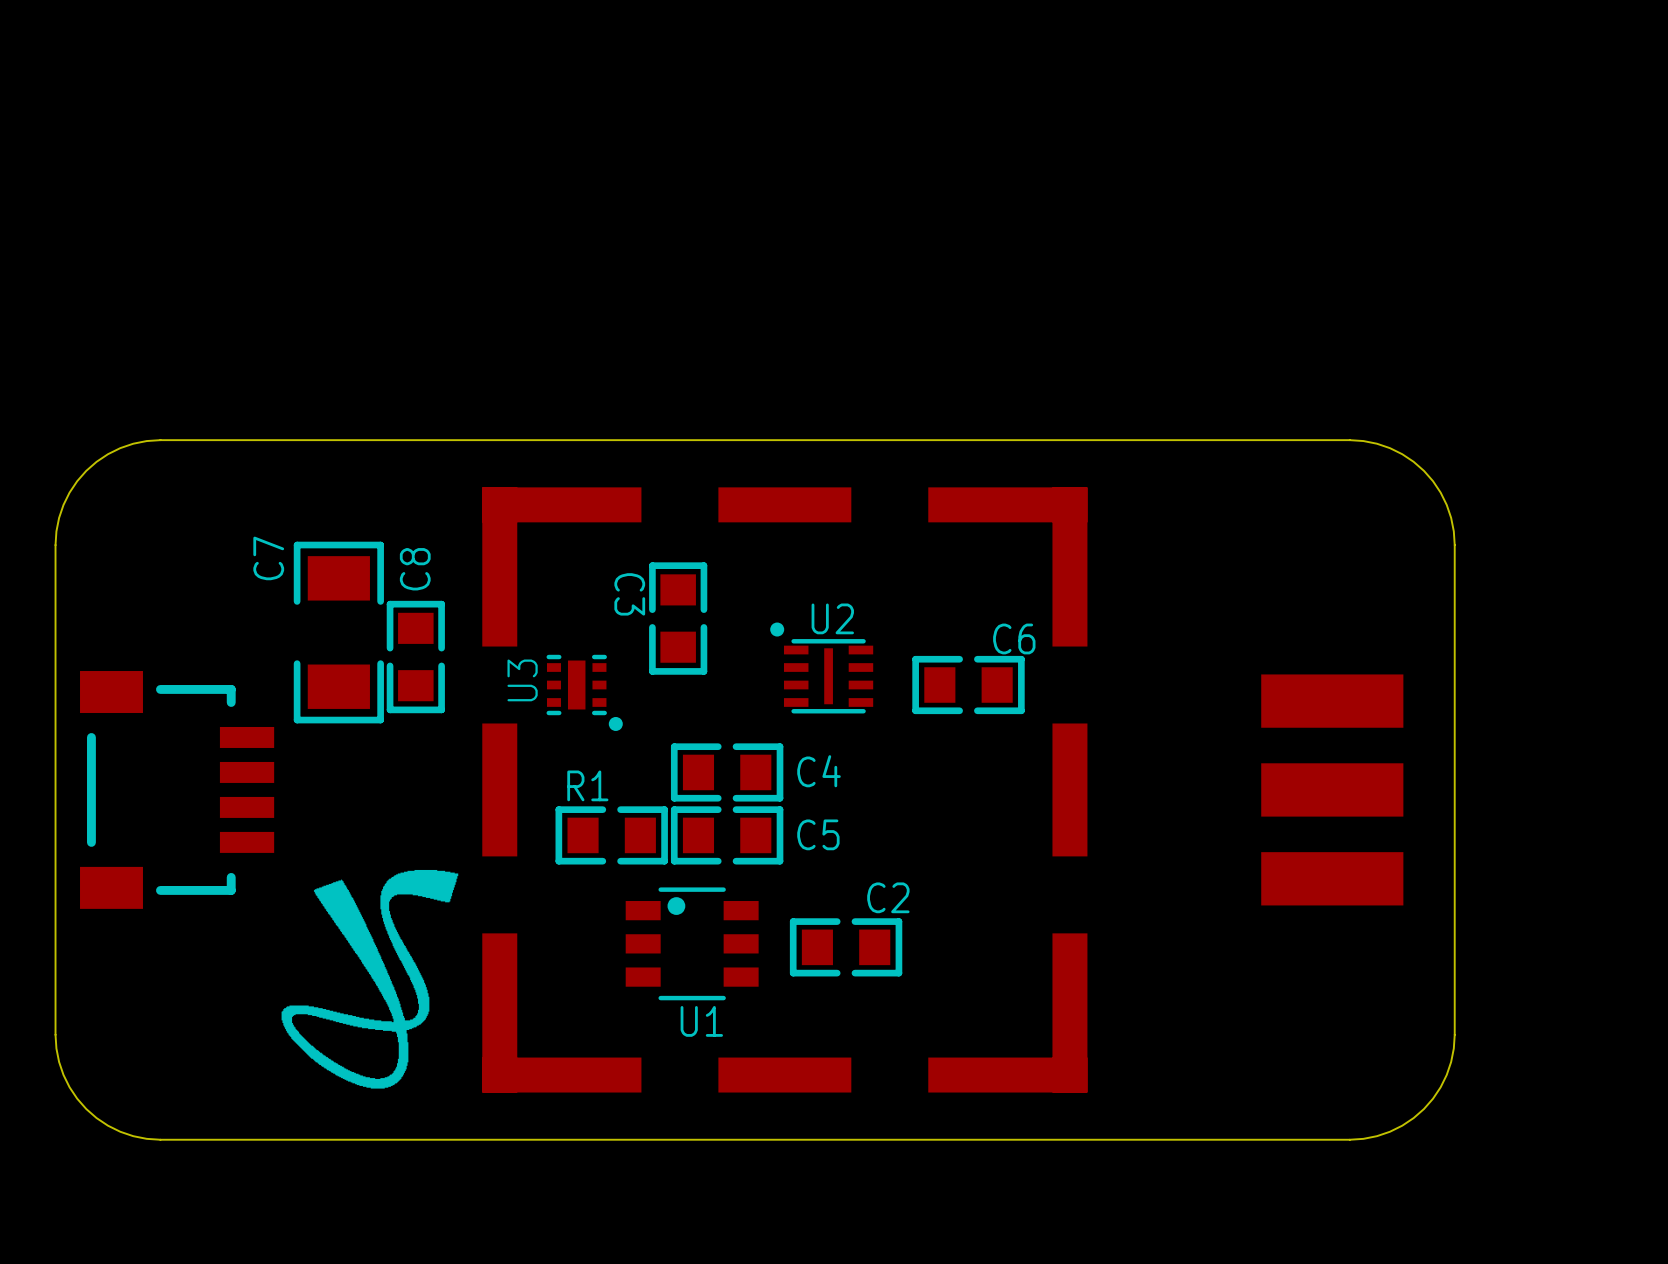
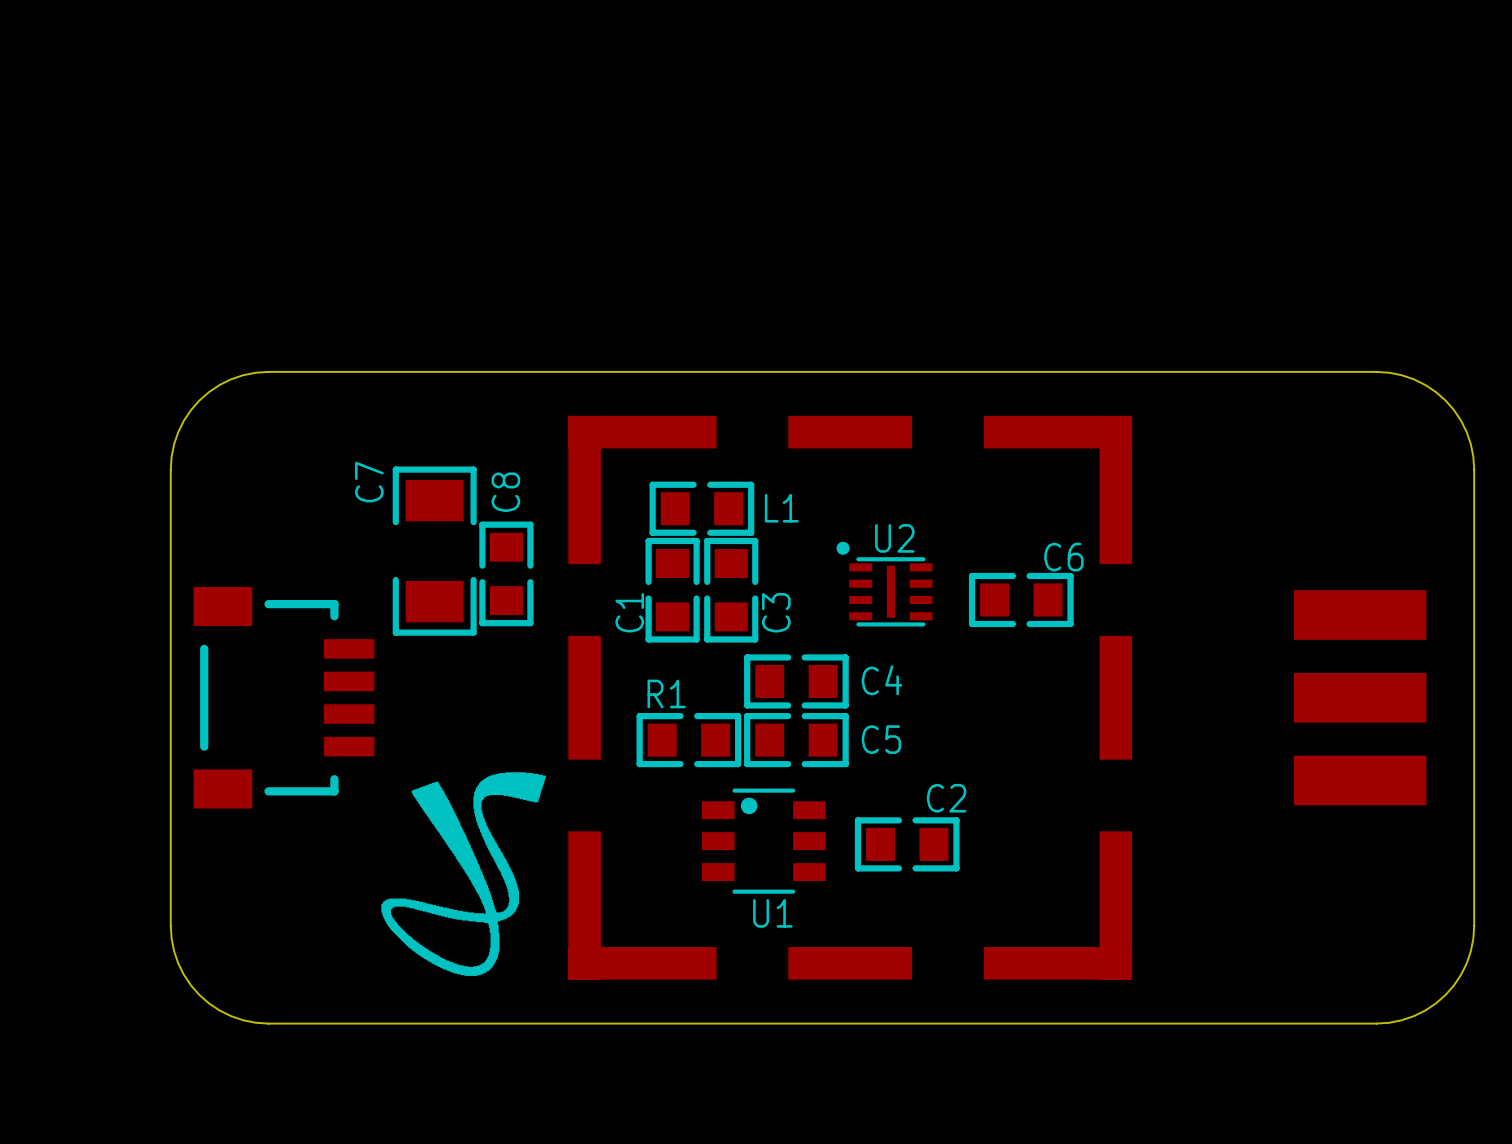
L1: none -> (701, 508)
C3 name rotation: 0° (629, 594) -> 180° (776, 612)
C3 name position: C3 (629, 594) -> C3 (776, 612)
C3 position: (678, 618) -> (731, 590)
C1: none -> (672, 590)
U3: (584, 692) -> none

